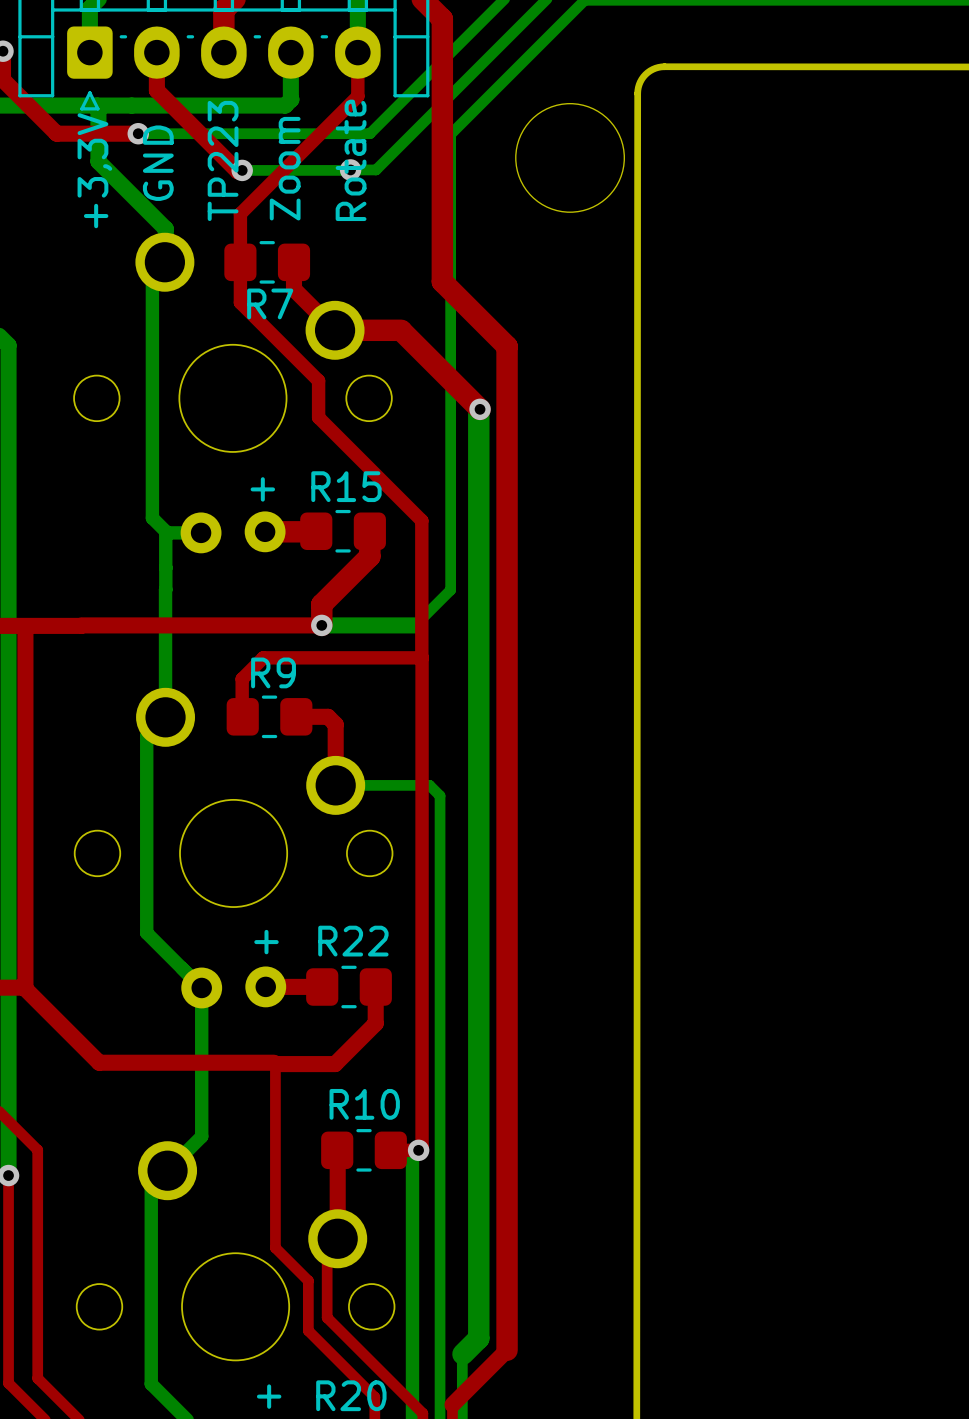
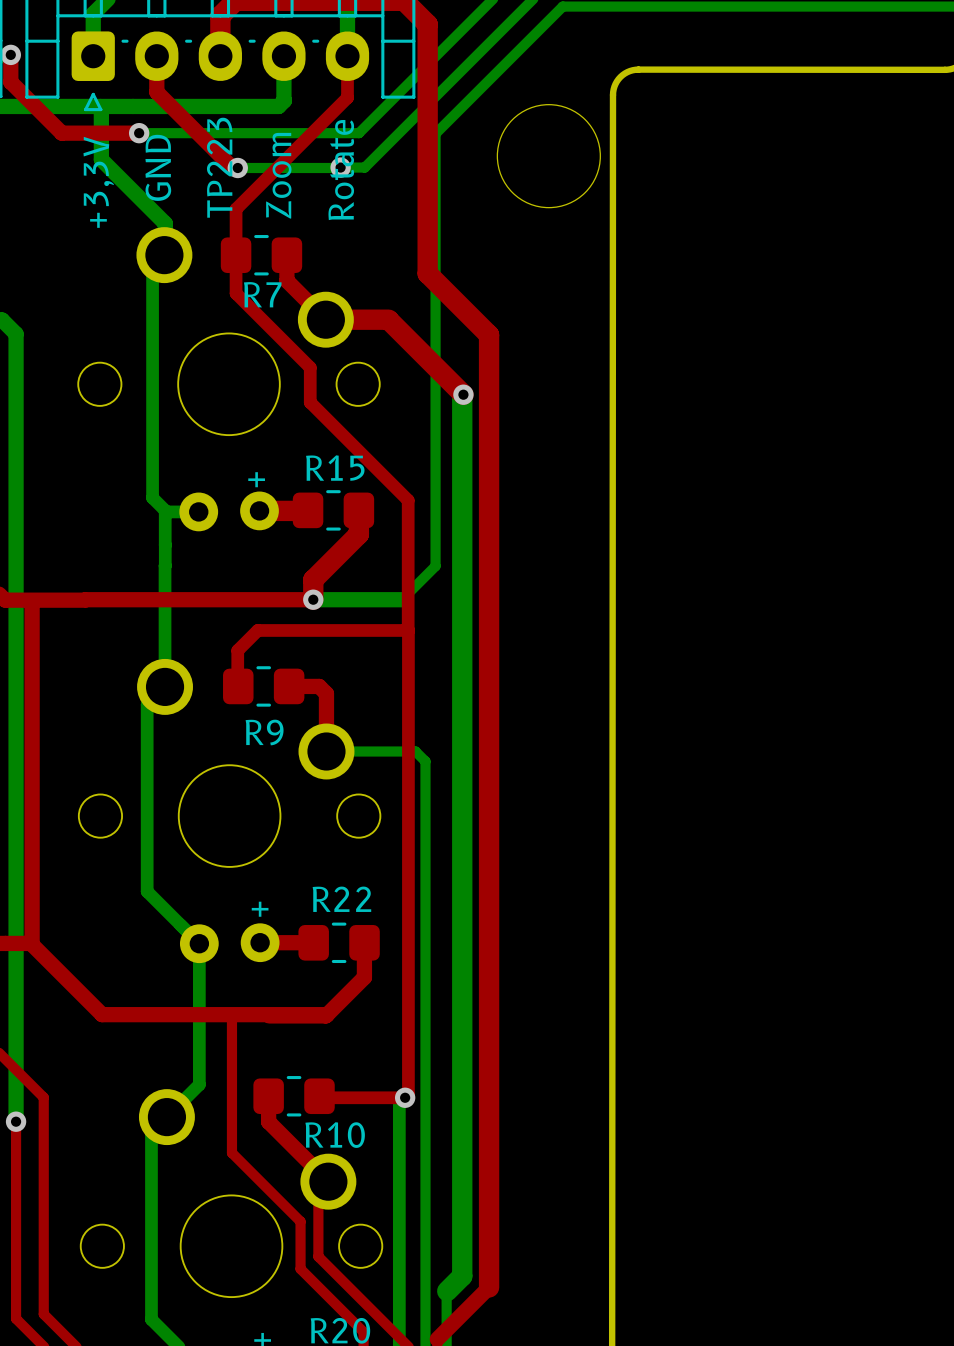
R9 name position: R9 (273, 672) -> R9 (264, 732)
top track: (275, 1064) (275, 1247) -> (327, 1014) (231, 1014) (231, 1153) (269, 1190)
R10 name position: R10 (364, 1104) -> R10 (335, 1135)
top track: none -> (319, 1096) (378, 1097)
top track: (337, 1150) (337, 1238) -> (268, 1096) (268, 1121) (328, 1181)
R10 position: (364, 1150) -> (294, 1096)

